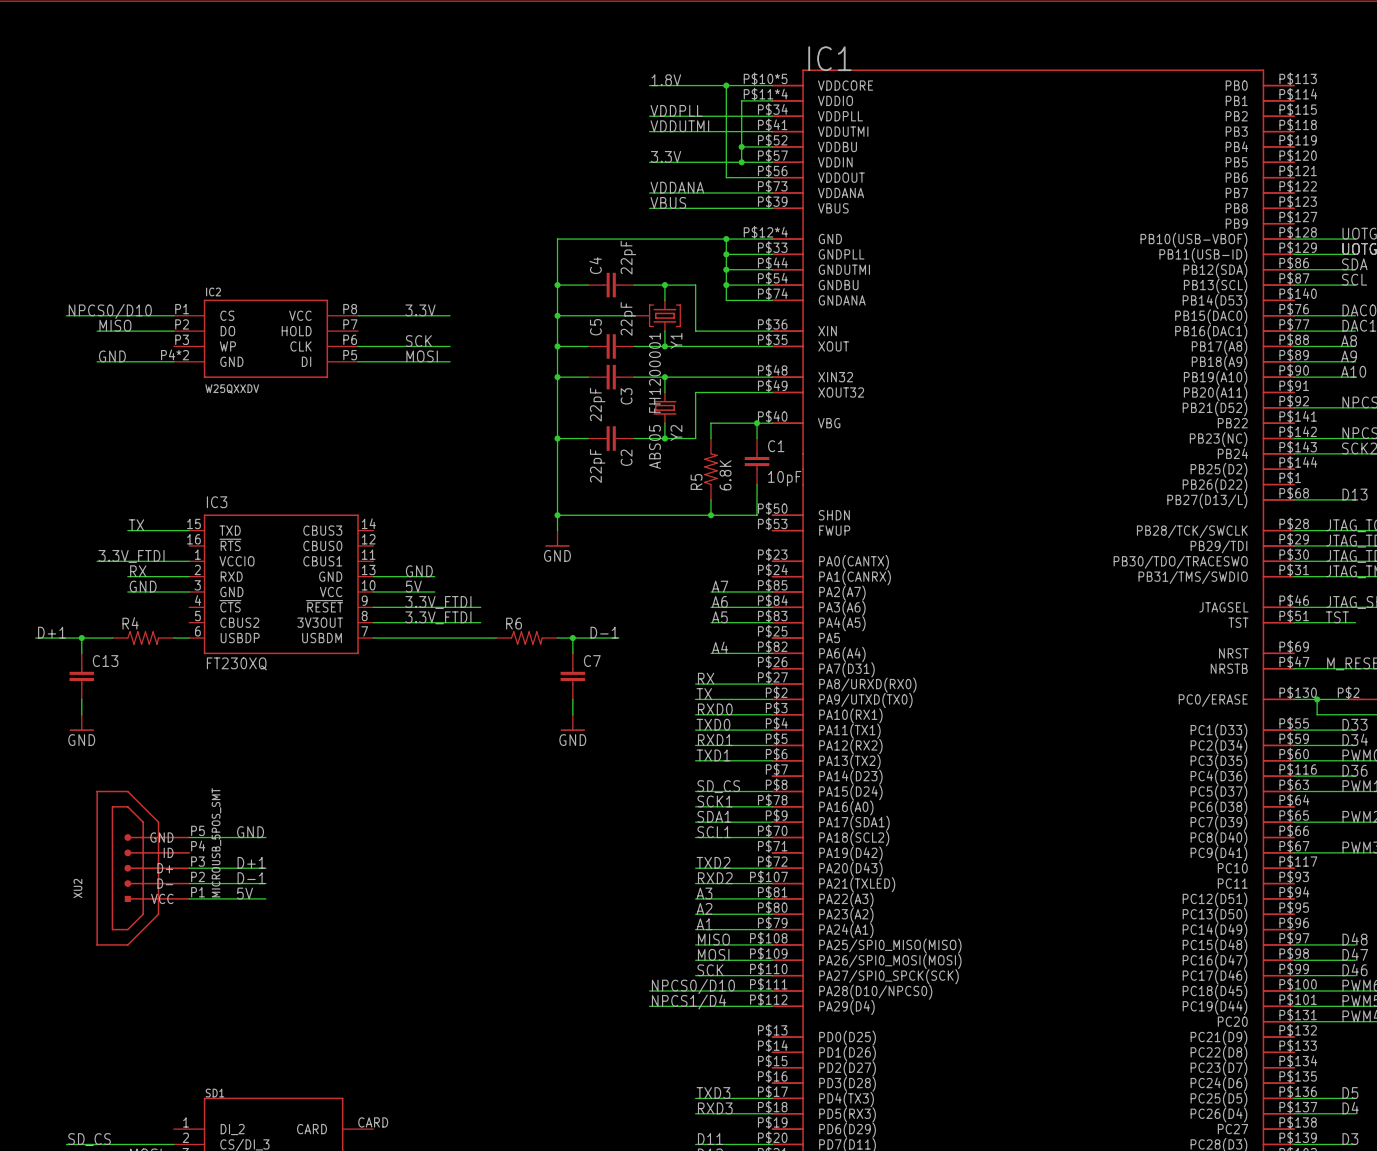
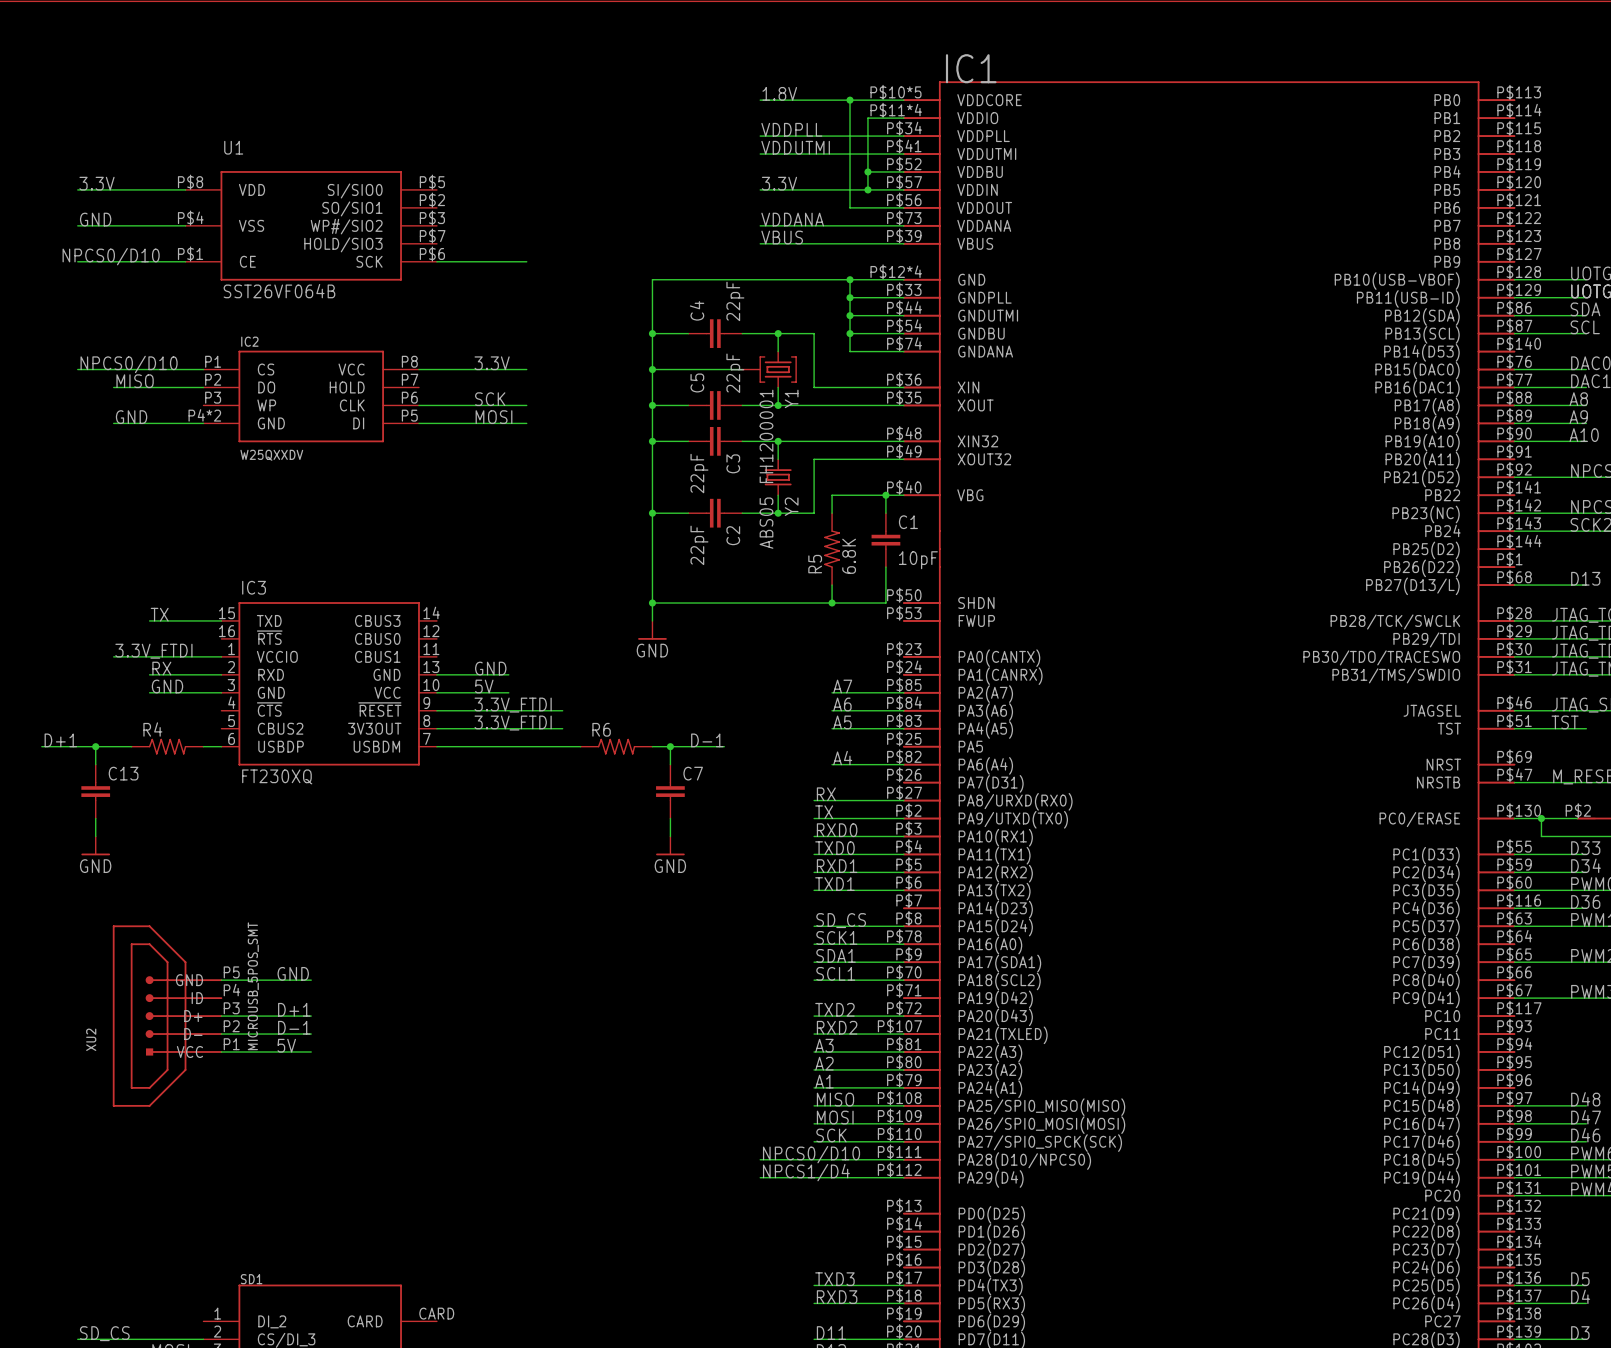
label: none -> 3.3V (97, 183)
wire: none -> (77, 189) (185, 189)
label: none -> GND (95, 219)
wire: none -> (77, 225) (185, 225)
U1: none -> SST26VF064B (311, 225)
label: none -> NPCS0/D10 (111, 256)
wire: none -> (77, 261) (185, 261)
wire: none -> (436, 261) (526, 261)

